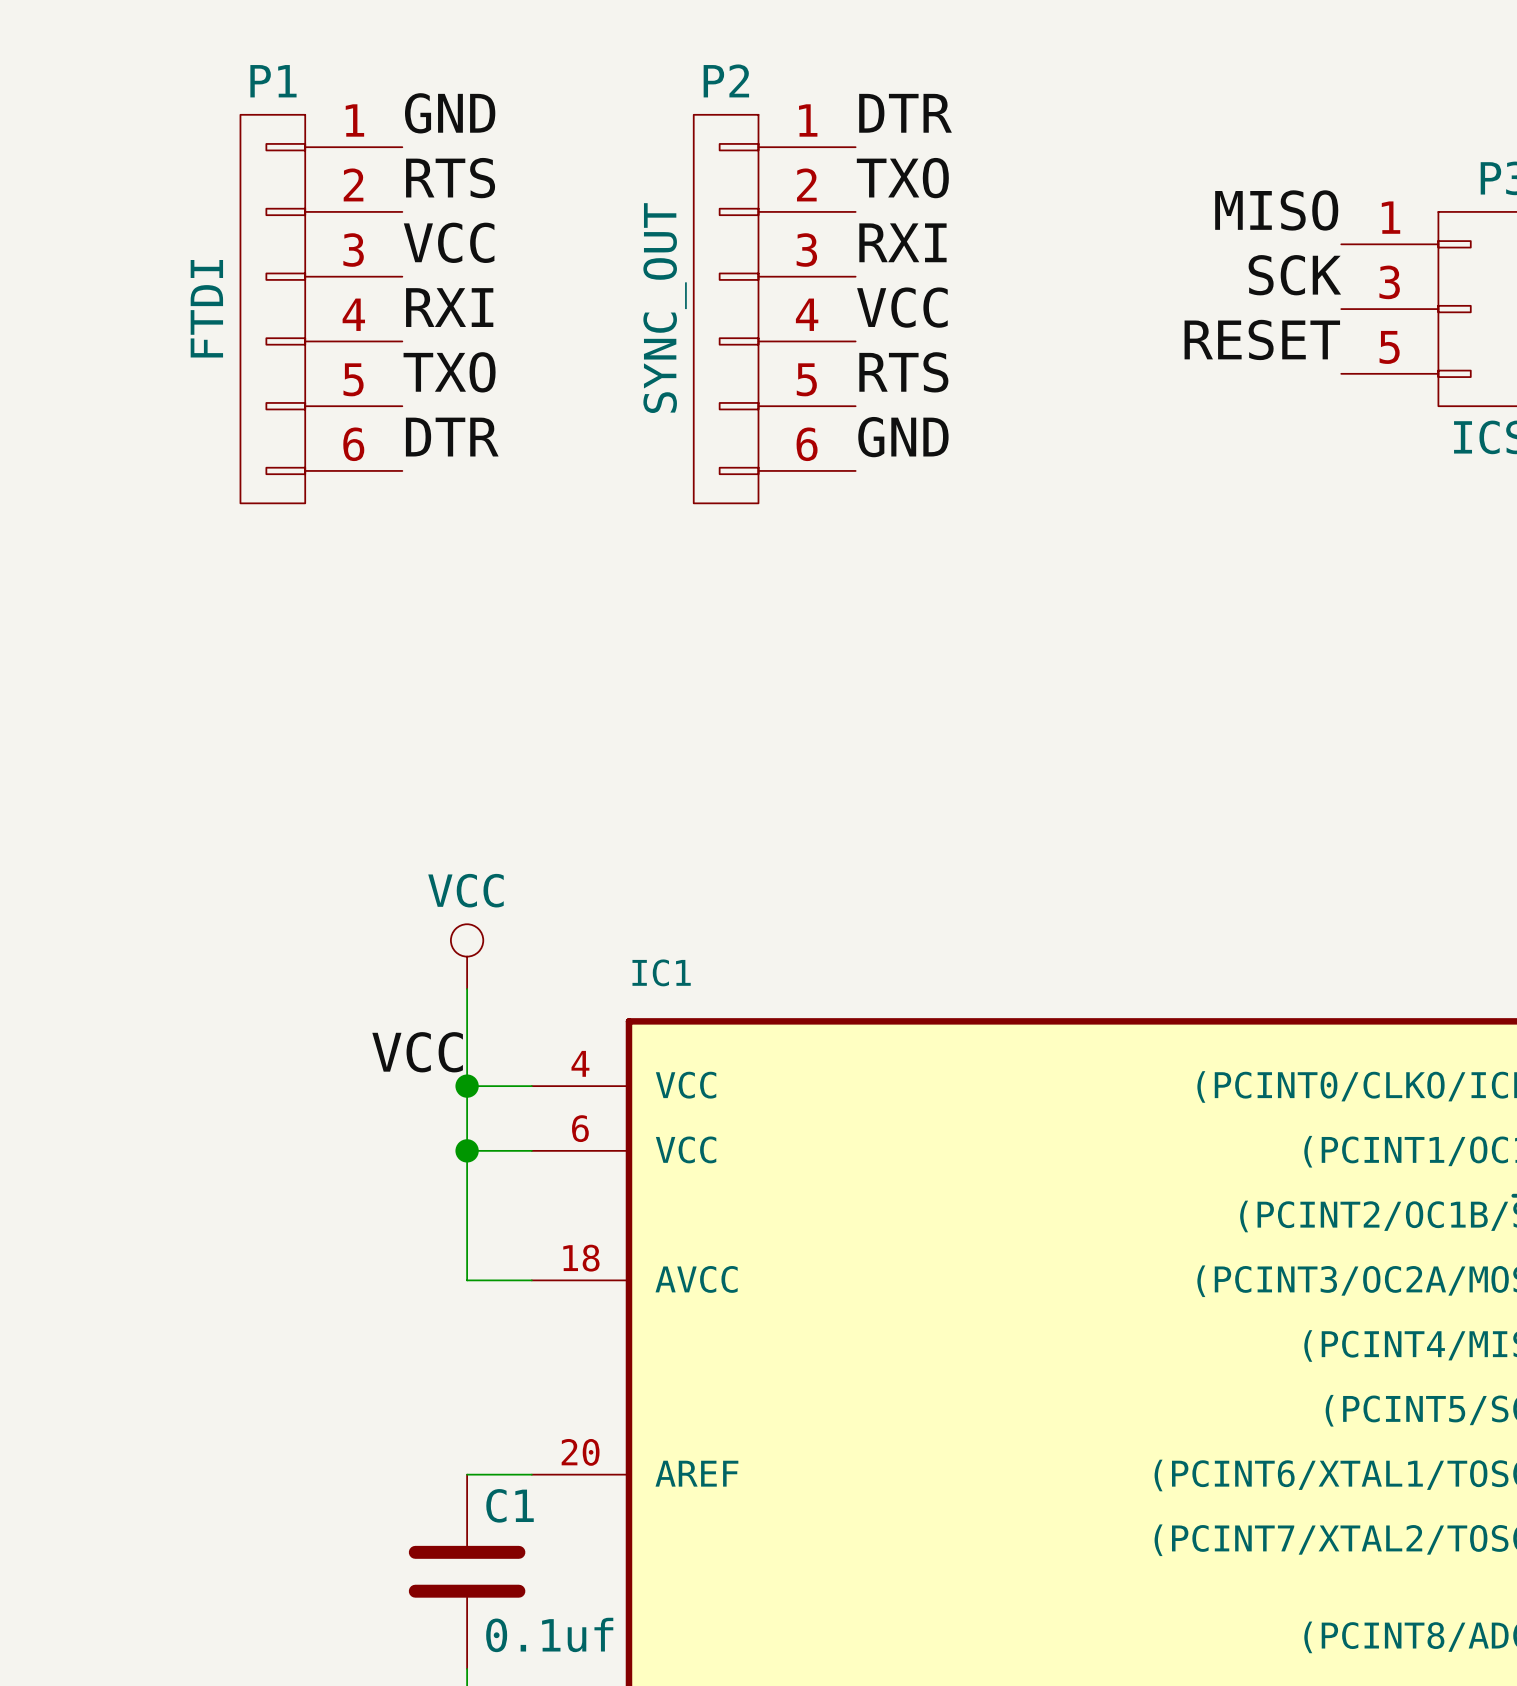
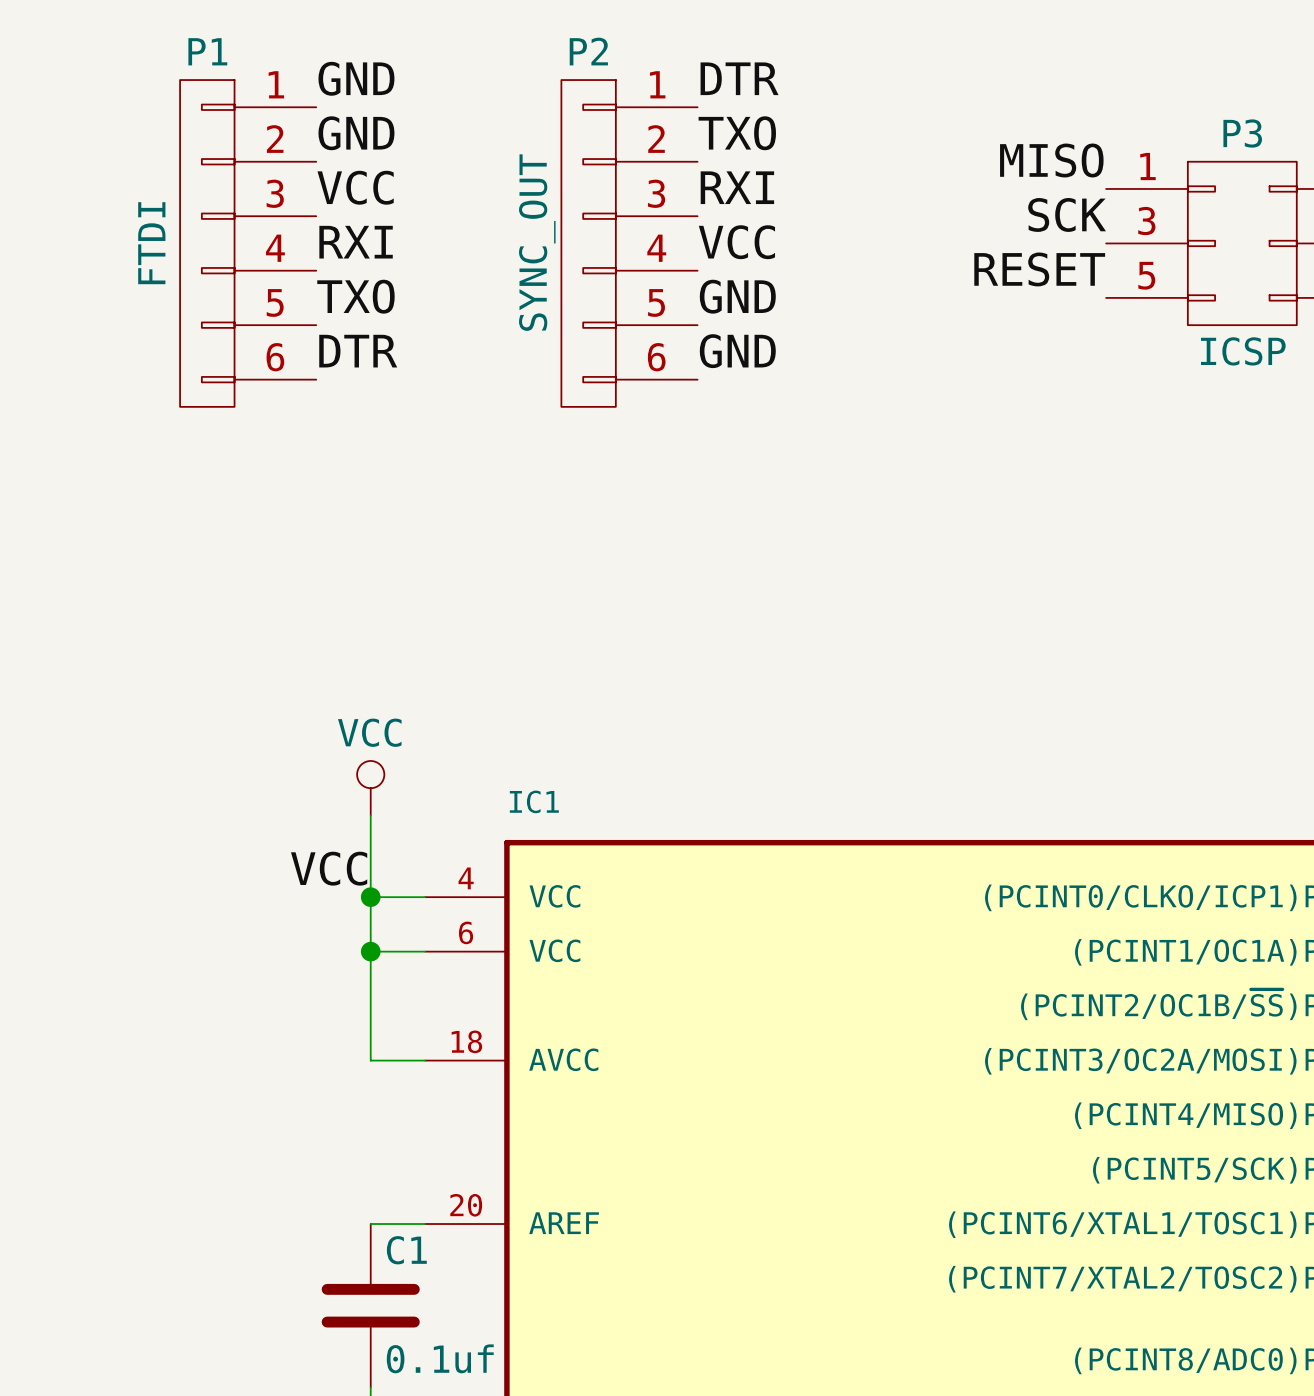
label: RTS (450, 178) -> GND (356, 133)
label: RTS (903, 372) -> GND (737, 296)

